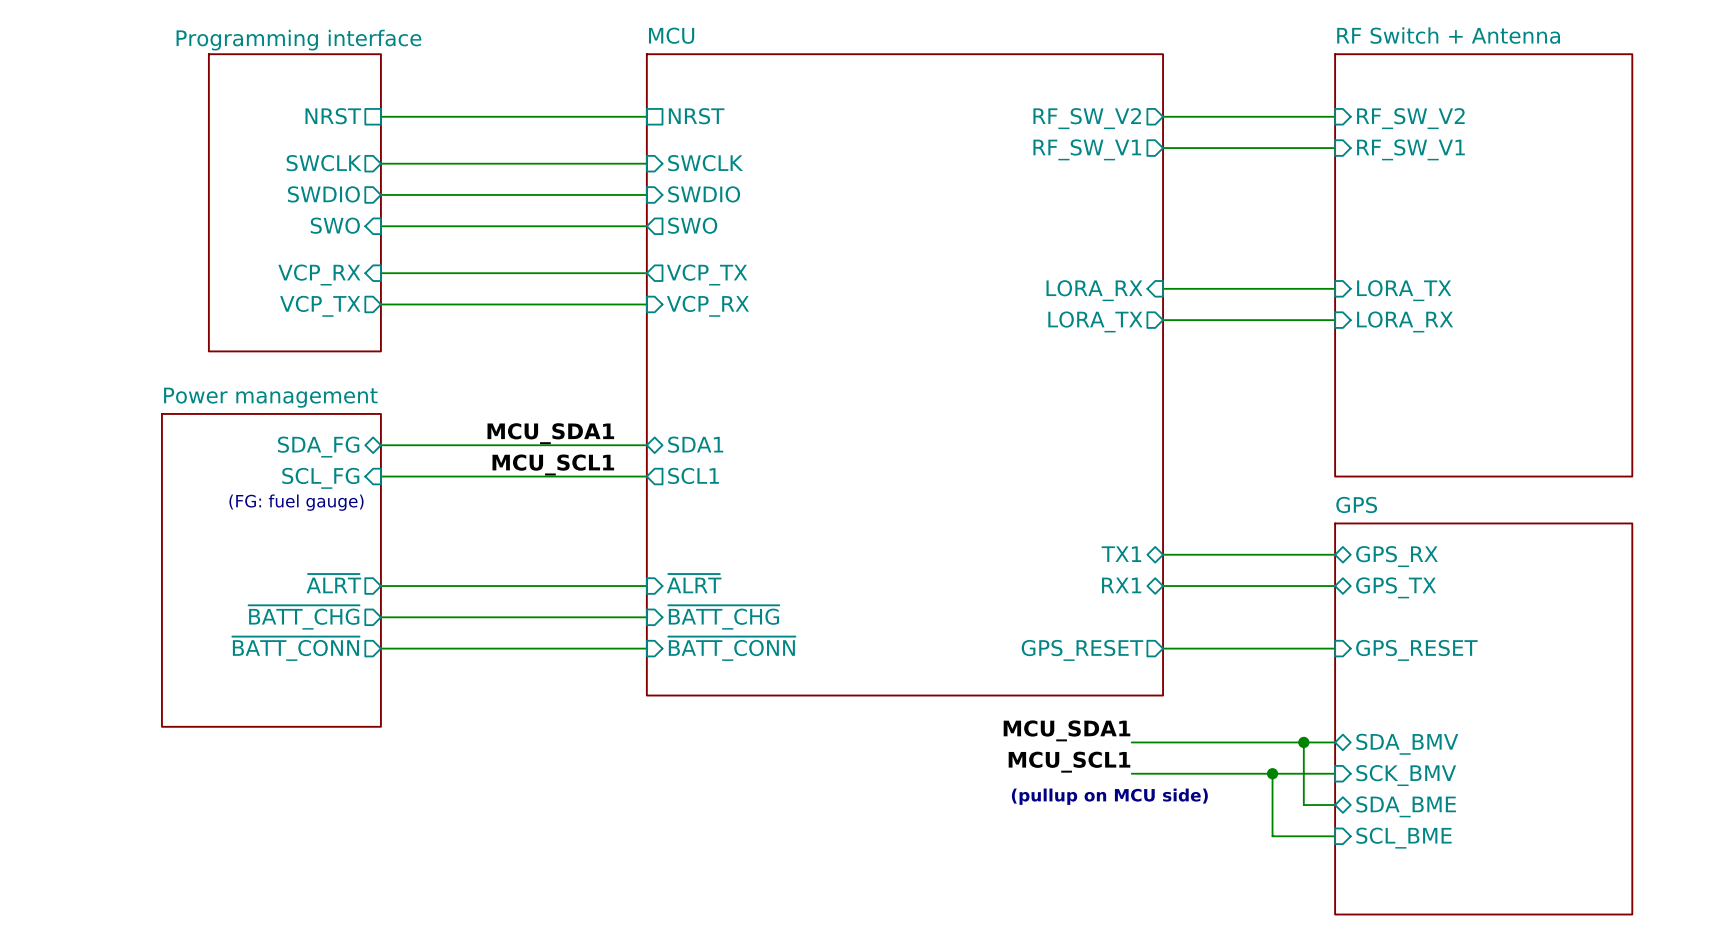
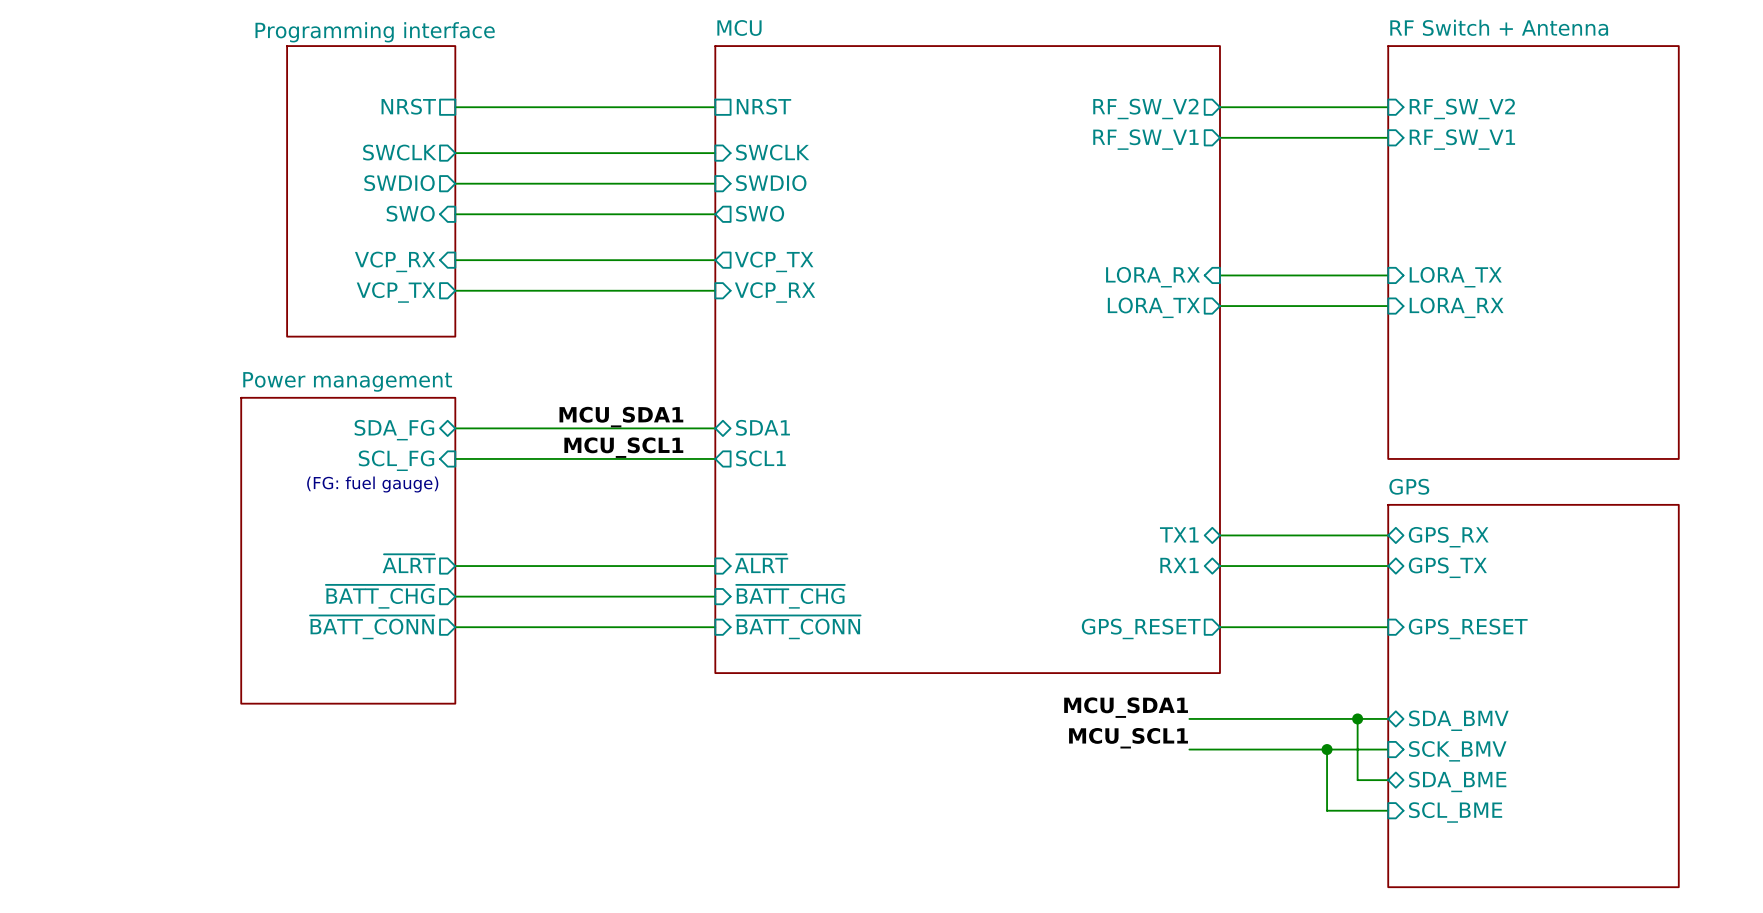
text: (pullup on MCU side) (1109, 796) -> none

